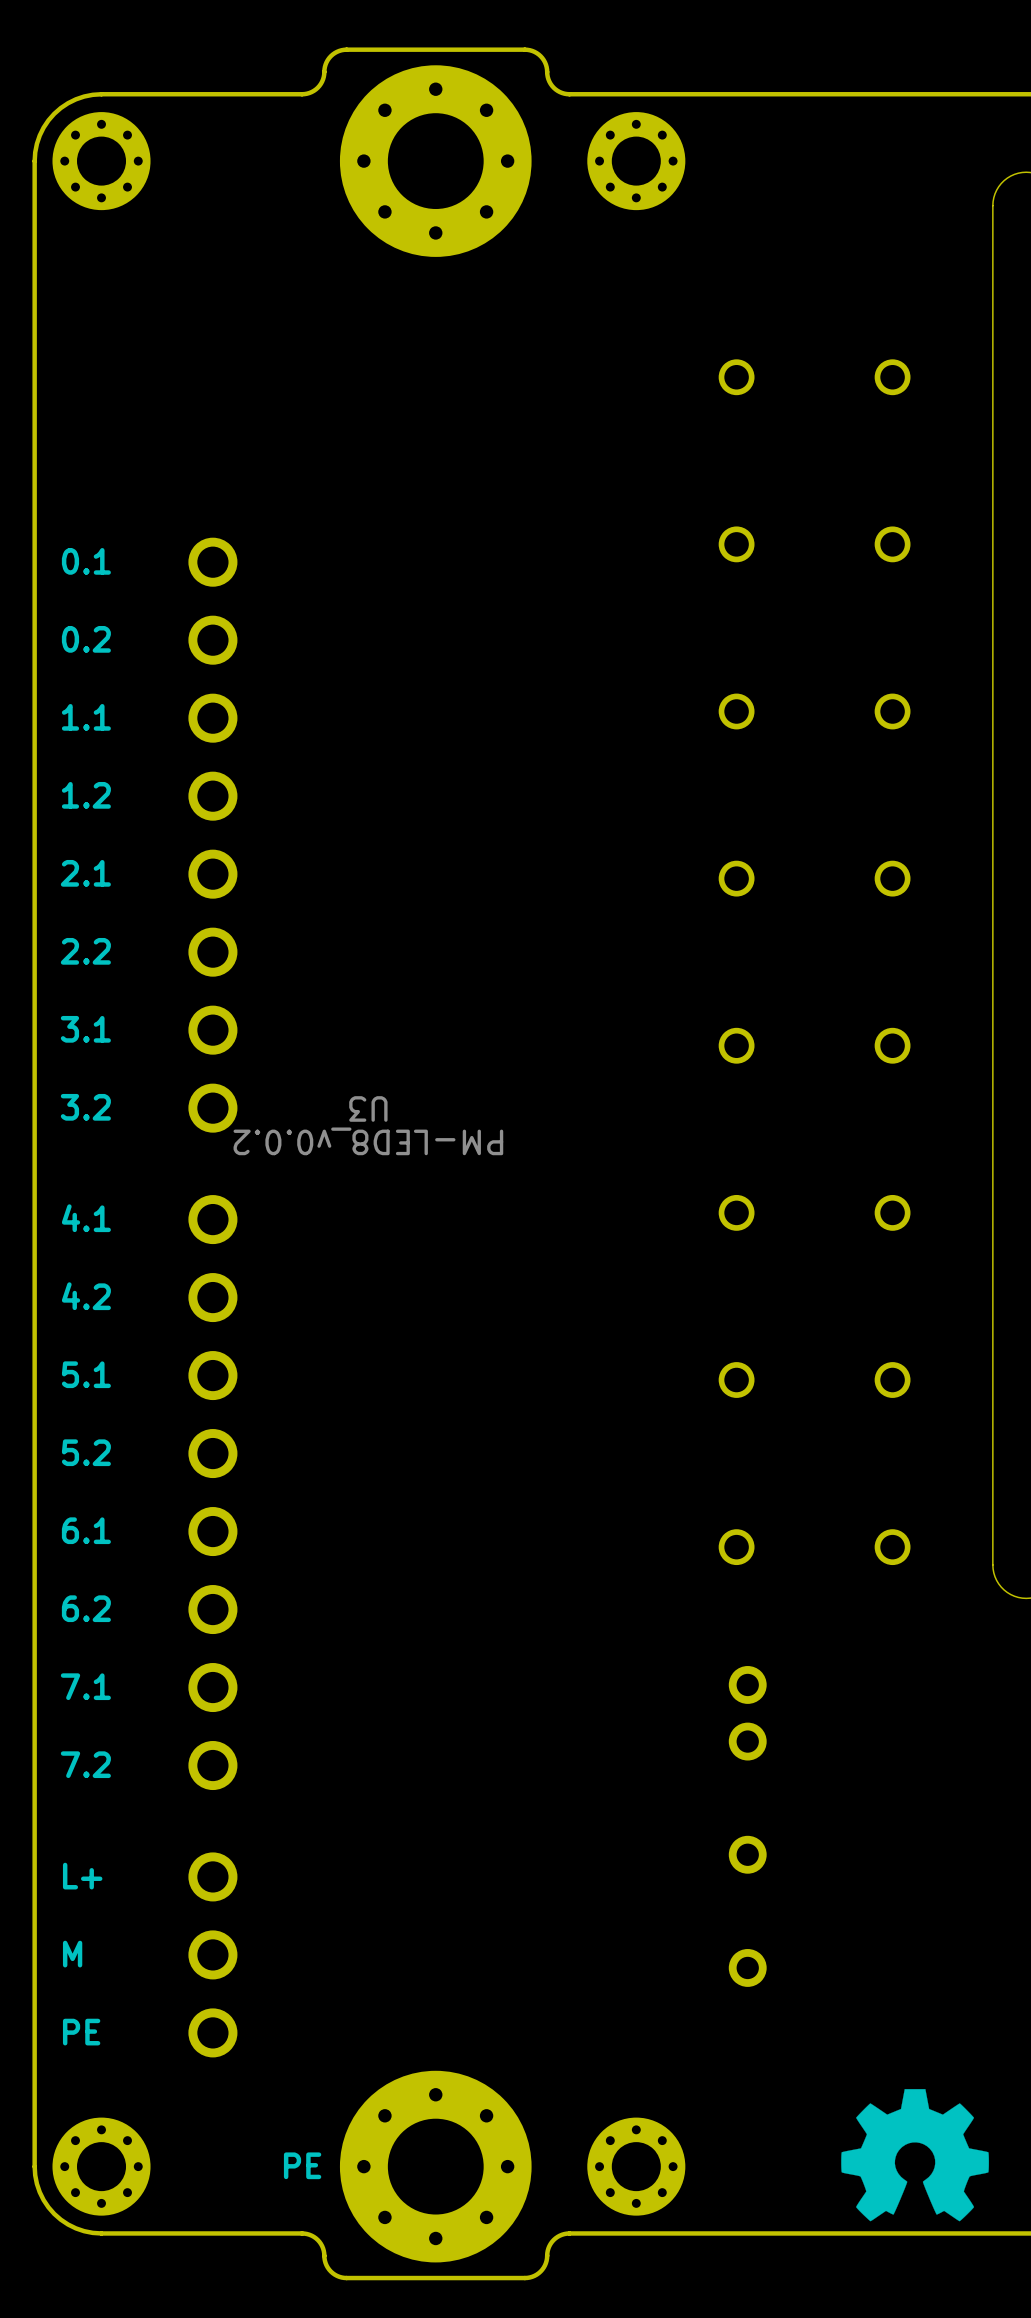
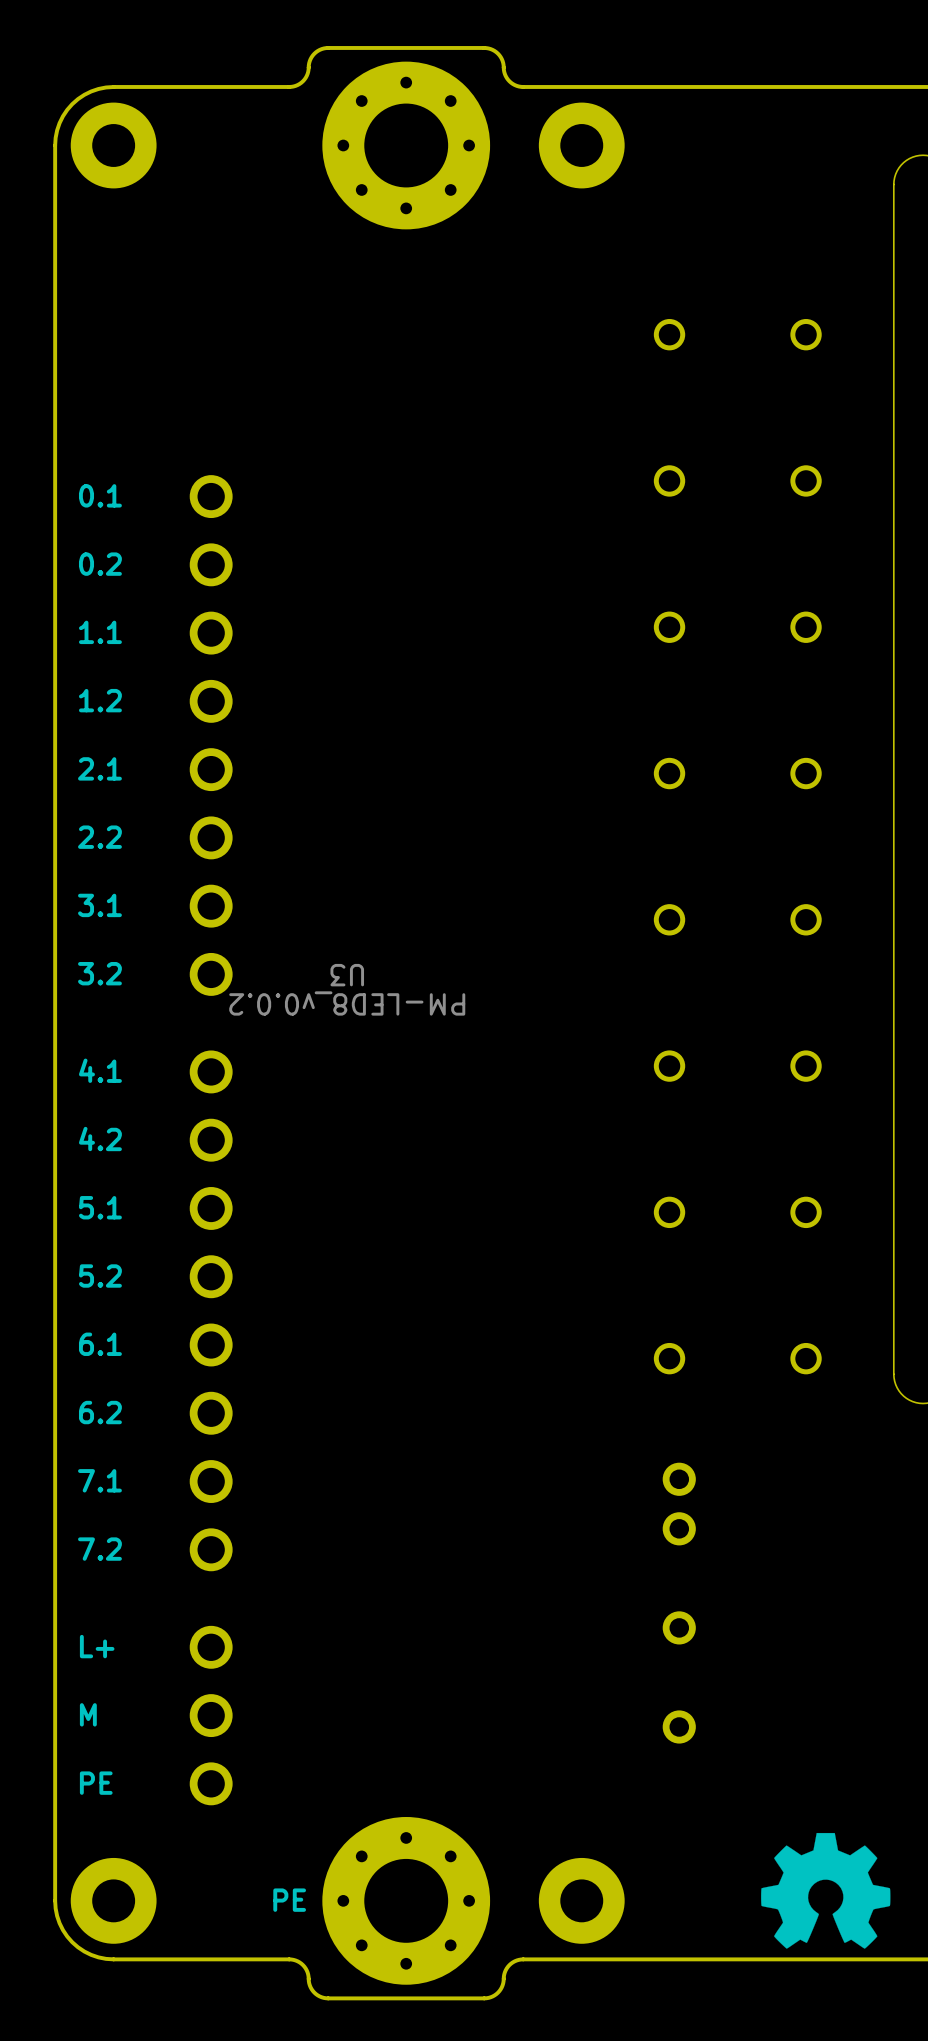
U3 footprint: [52, 112, 686, 2216] -> [70, 102, 625, 1944]

